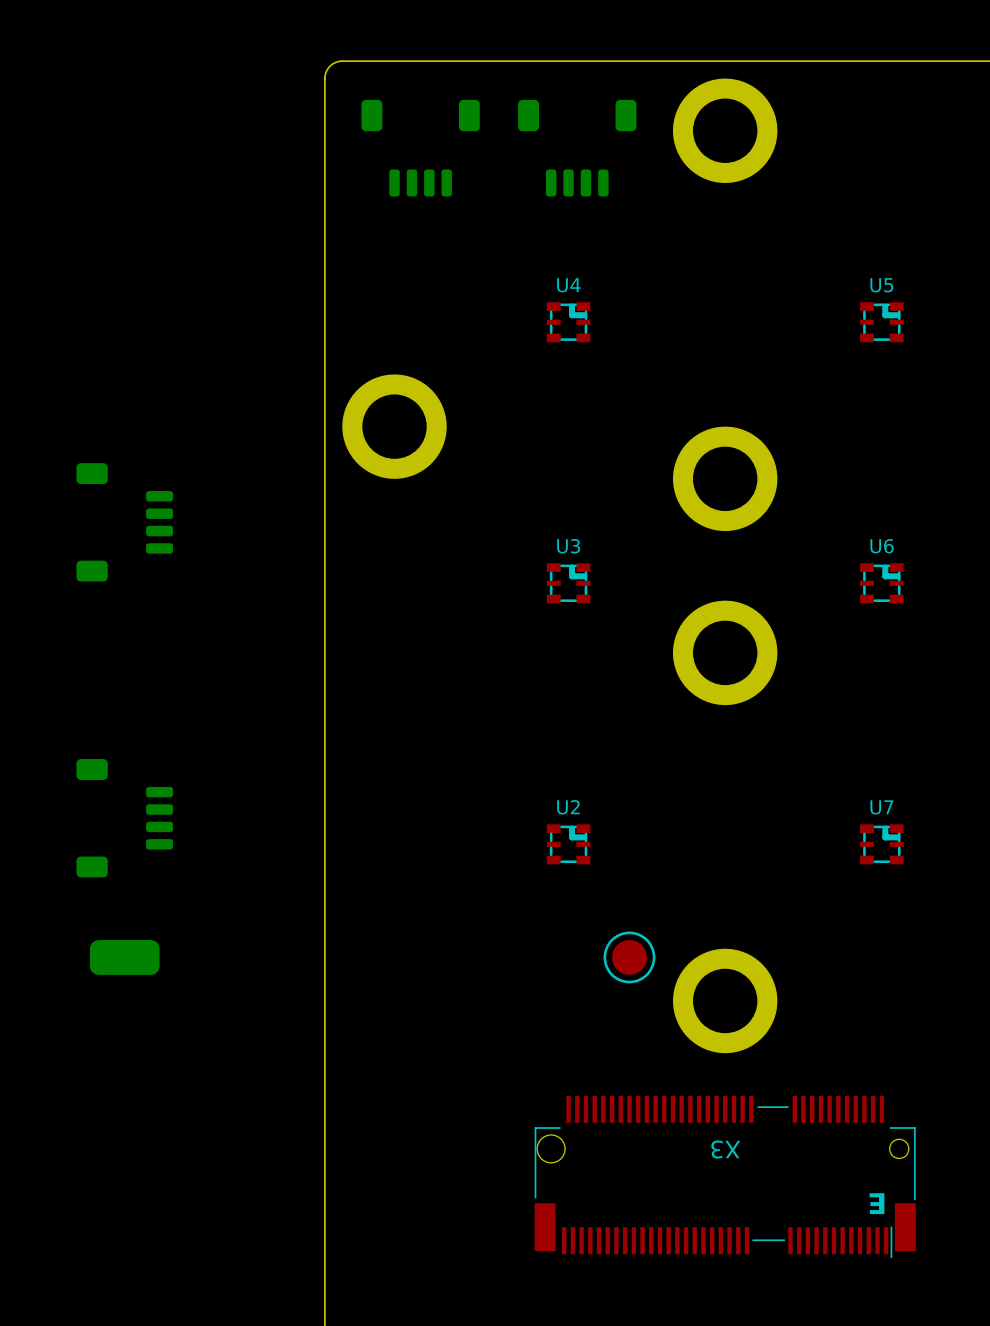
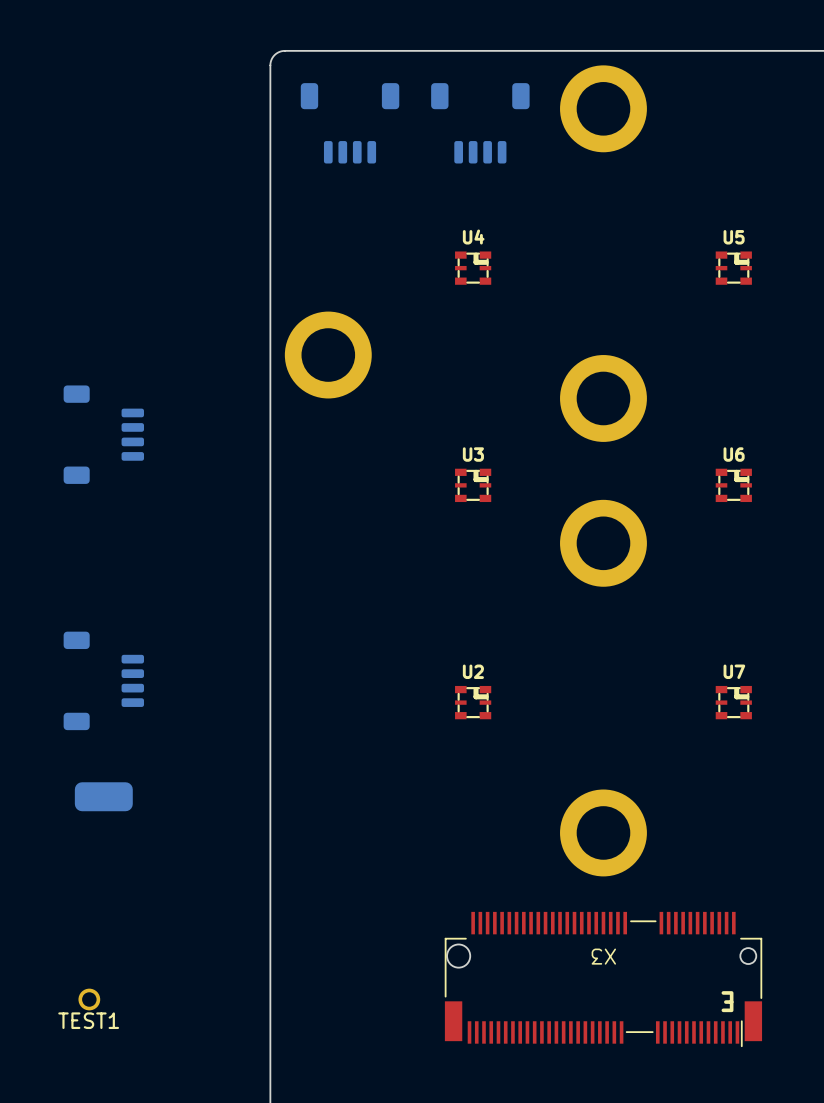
part: (629, 957) -> none
TEST1: none -> (89, 999)

